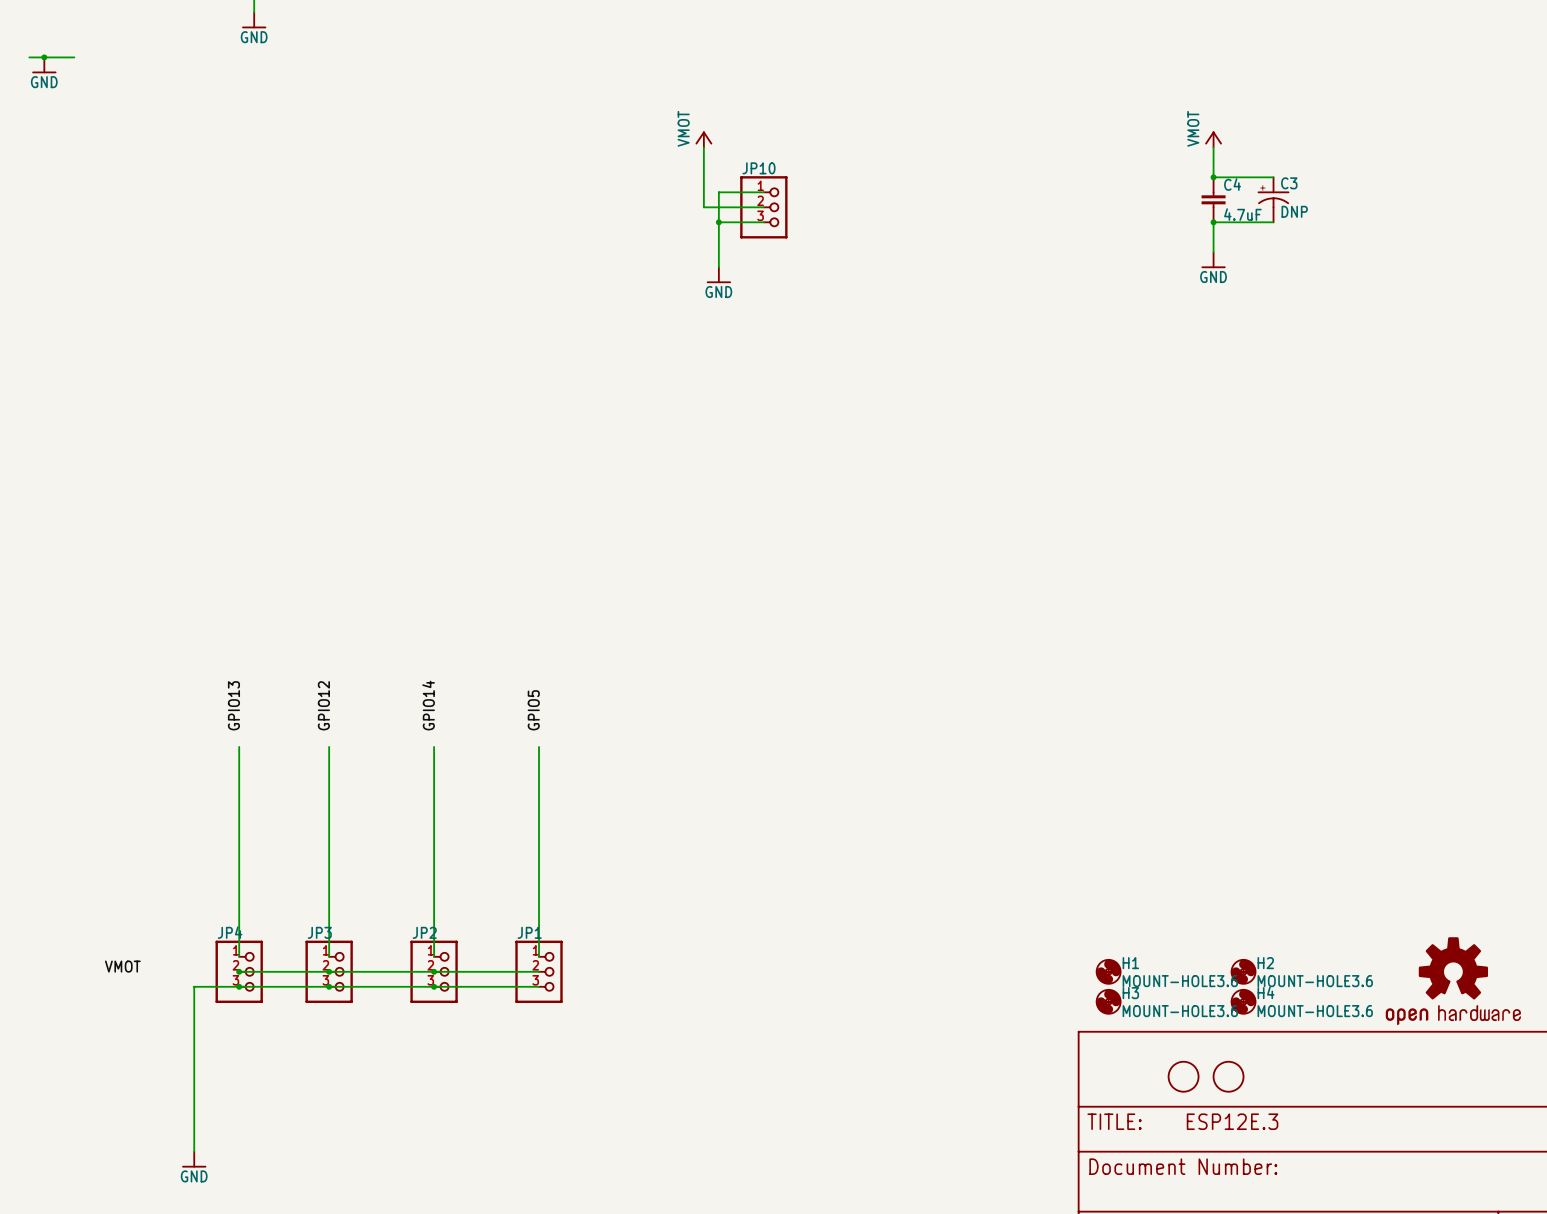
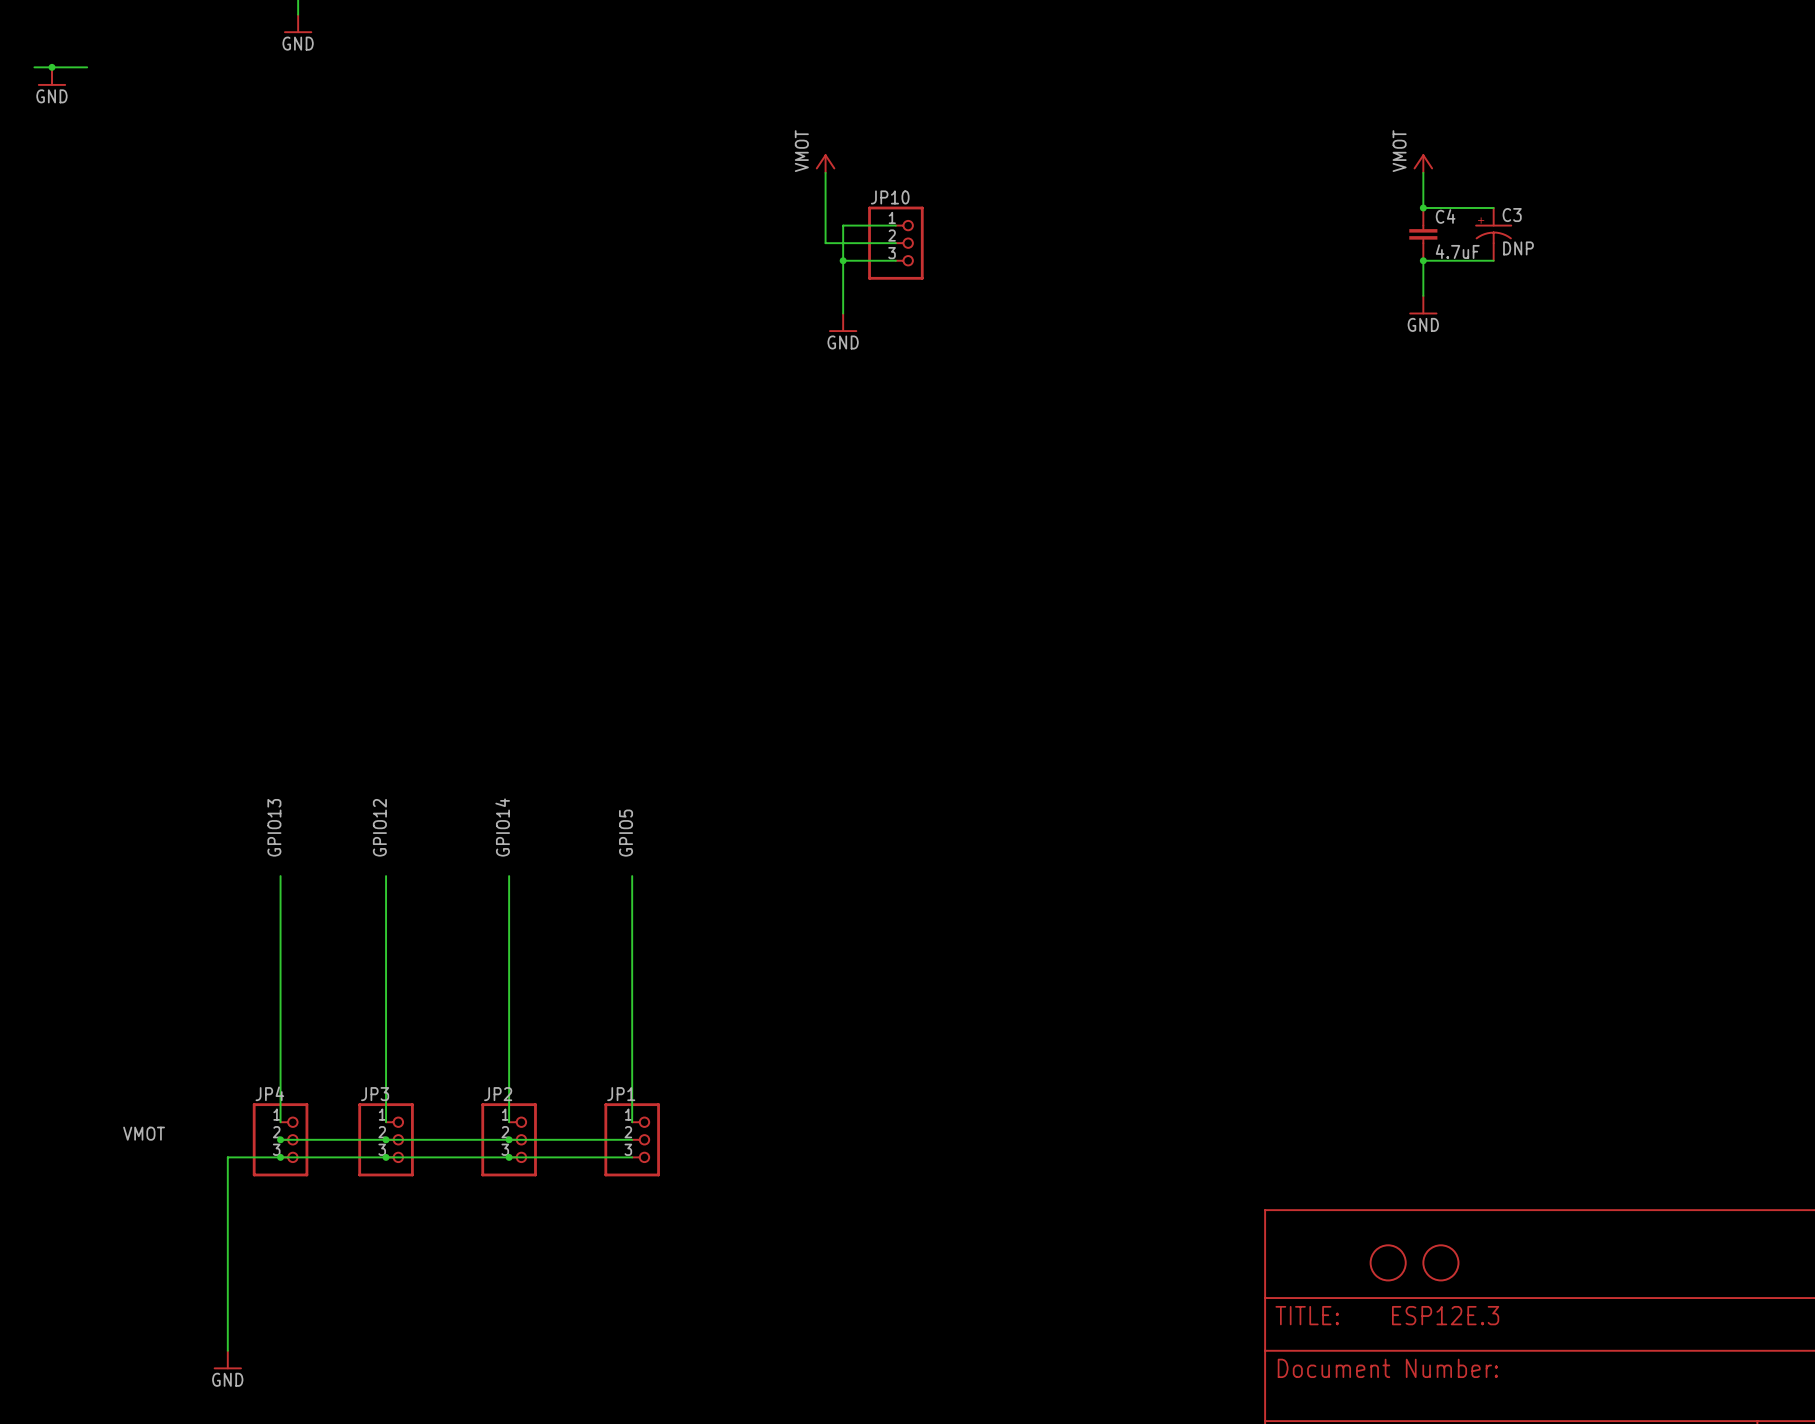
H1: MOUNT-HOLE3.6 (1108, 971) -> none
H2: MOUNT-HOLE3.6 (1243, 971) -> none
part: (1453, 981) -> none
H3: MOUNT-HOLE3.6 (1108, 1001) -> none
H4: MOUNT-HOLE3.6 (1243, 1001) -> none

